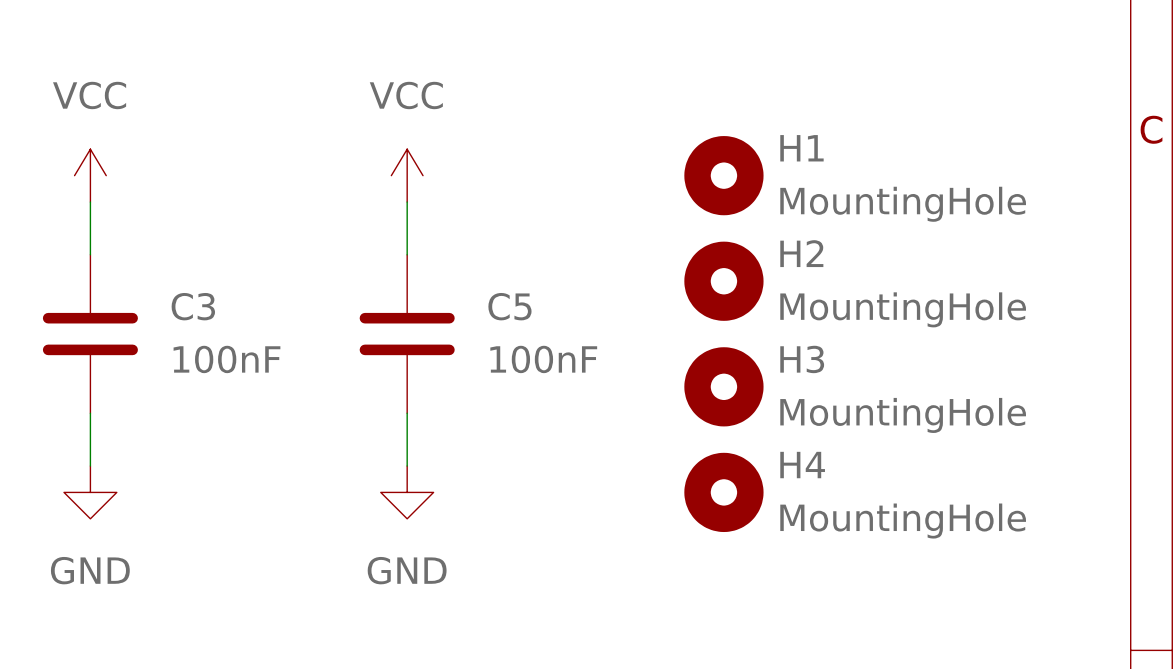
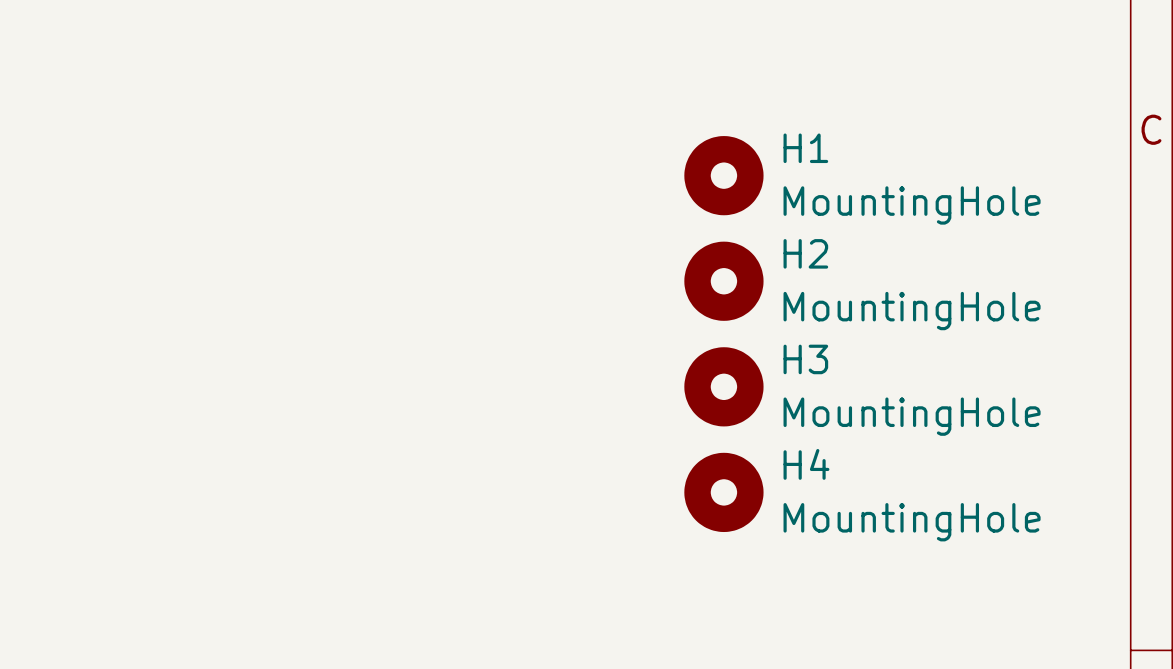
power symbol: VCC (90, 175) -> none
power symbol: VCC (407, 175) -> none
wire: (90, 202) (90, 254) -> none
wire: (407, 202) (407, 254) -> none
C3: 100nF (90, 334) -> none
C5: 100nF (407, 334) -> none
wire: (90, 413) (90, 466) -> none
wire: (407, 413) (407, 466) -> none
power symbol: GND (90, 492) -> none
power symbol: GND (407, 492) -> none

